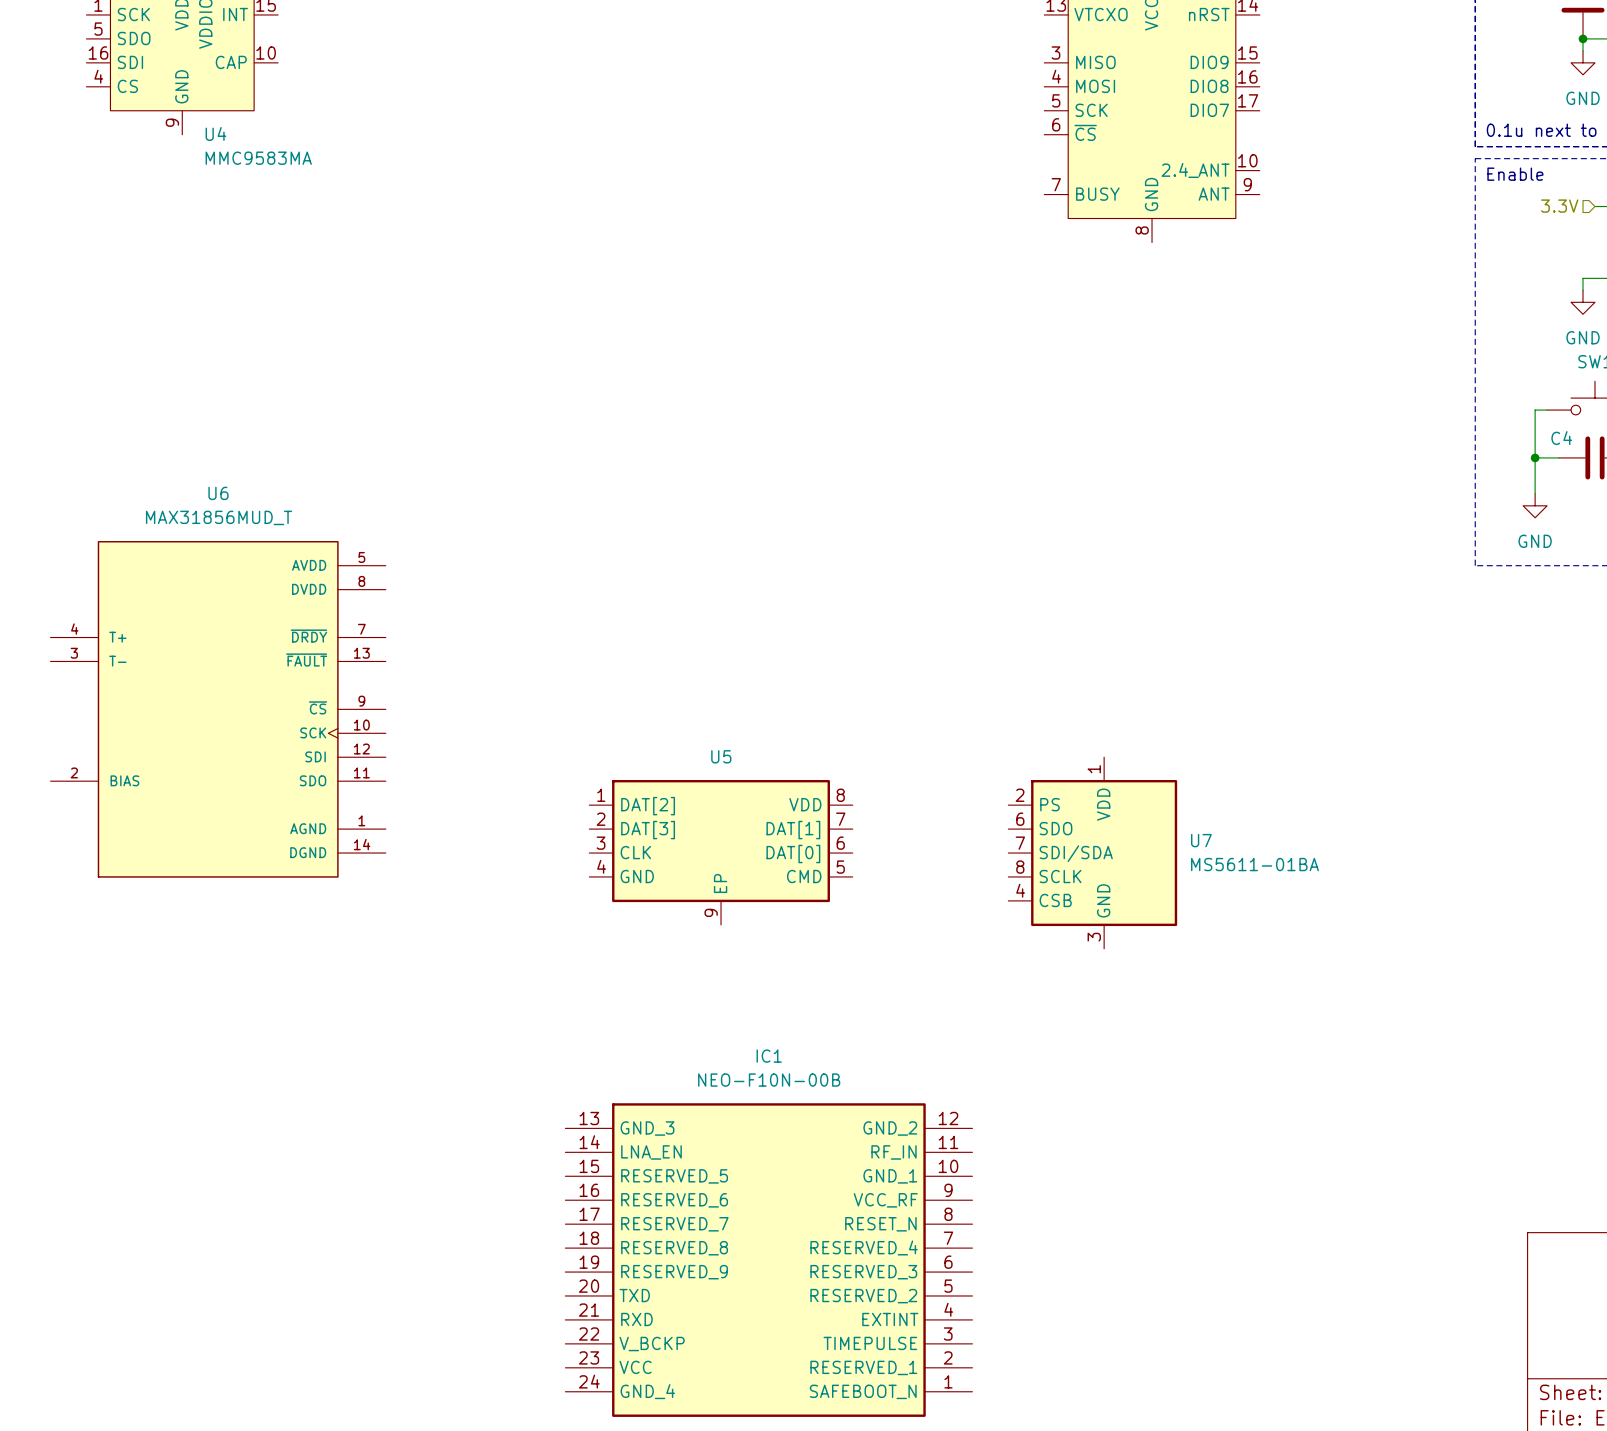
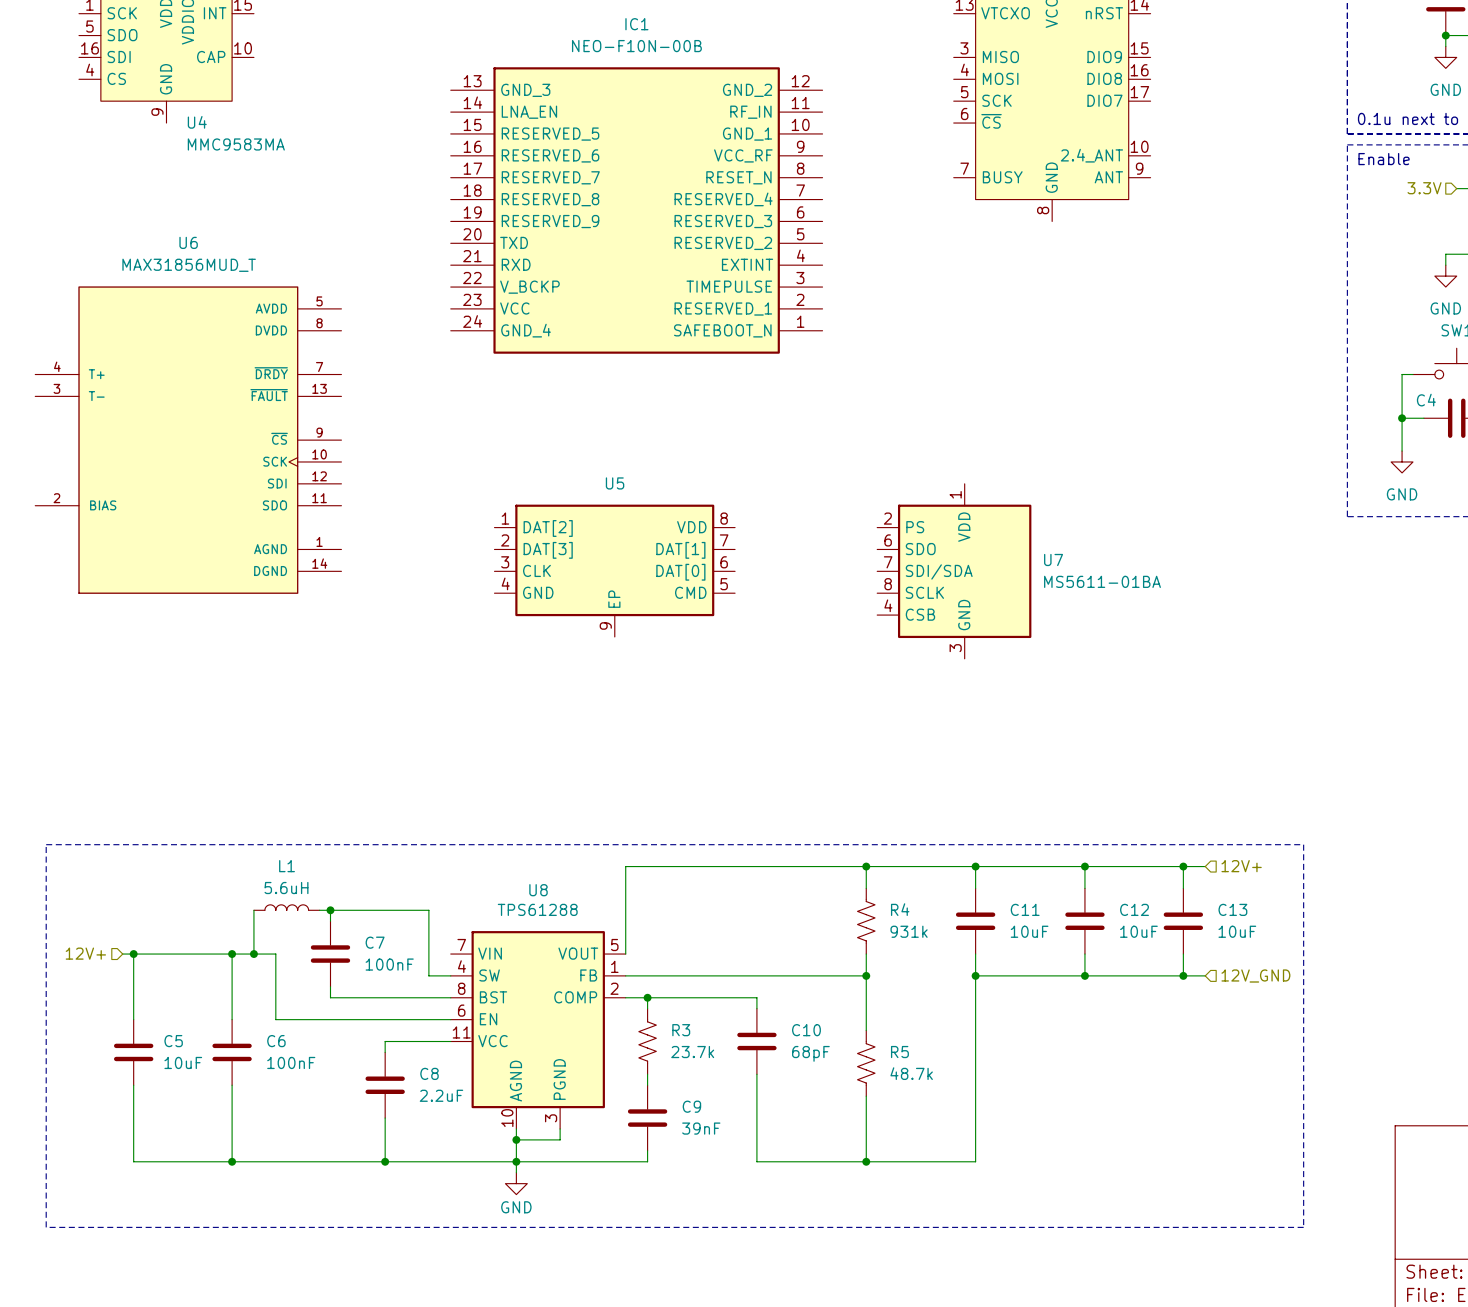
U6 position: (218, 709) -> (188, 440)
U5 position: (721, 852) -> (614, 570)
U7 position: (1092, 853) -> (954, 571)
line: none -> (46, 844) (1303, 844) (1303, 1227) (46, 1227) (46, 844)
wire: none -> (866, 866) (866, 888)
junction: none -> (866, 866)
wire: none -> (975, 866) (975, 888)
junction: none -> (975, 866)
wire: none -> (1084, 866) (1084, 888)
junction: none -> (1084, 866)
wire: none -> (1183, 866) (1183, 888)
junction: none -> (1183, 866)
wire: none -> (1205, 866) (625, 866) (625, 954)
hierarchical label: none -> 12V+ (1241, 866)
L1: none -> 5.6uH (286, 907)
wire: none -> (253, 910) (253, 954)
wire: none -> (319, 910) (428, 910) (428, 975) (450, 975)
wire: none -> (330, 910) (330, 921)
junction: none -> (330, 910)
R4: none -> 931k (866, 921)
C11: none -> 10uF (975, 921)
C12: none -> 10uF (1084, 921)
C13: none -> 10uF (1183, 921)
hierarchical label: none -> 12V+ (85, 953)
wire: none -> (122, 954) (275, 954) (275, 1019) (450, 1019)
wire: none -> (133, 954) (133, 1019)
junction: none -> (133, 954)
wire: none -> (232, 954) (232, 1019)
junction: none -> (232, 954)
junction: none -> (253, 954)
C7: none -> 100nF (330, 954)
wire: none -> (866, 954) (866, 1030)
wire: none -> (975, 954) (975, 1161) (756, 1161) (756, 1074)
wire: none -> (1084, 954) (1084, 975)
wire: none -> (1183, 954) (1183, 975)
wire: none -> (625, 975) (866, 975)
junction: none -> (866, 975)
wire: none -> (975, 975) (1205, 975)
junction: none -> (975, 975)
junction: none -> (1084, 975)
junction: none -> (1183, 975)
hierarchical label: none -> 12V_GND (1255, 976)
wire: none -> (330, 986) (330, 997) (450, 997)
wire: none -> (625, 997) (756, 997) (756, 1008)
wire: none -> (647, 997) (647, 1008)
junction: none -> (647, 997)
U8: none -> TPS61288 (538, 1030)
wire: none -> (450, 1041) (385, 1041) (385, 1052)
R3: none -> 23.7k (647, 1041)
C10: none -> 68pF (756, 1041)
C5: none -> 10uF (133, 1052)
C6: none -> 100nF (232, 1052)
R5: none -> 48.7k (866, 1063)
wire: none -> (133, 1085) (133, 1161) (647, 1161) (647, 1150)
wire: none -> (232, 1085) (232, 1161)
C8: none -> 2.2uF (385, 1085)
wire: none -> (866, 1096) (866, 1161)
wire: none -> (385, 1118) (385, 1161)
C9: none -> 39nF (647, 1118)
wire: none -> (516, 1128) (516, 1172)
junction: none -> (516, 1139)
IC1 position: (768, 1260) -> (636, 210)
junction: none -> (232, 1161)
junction: none -> (385, 1161)
junction: none -> (516, 1161)
junction: none -> (866, 1161)
power symbol: none -> GND (516, 1183)

